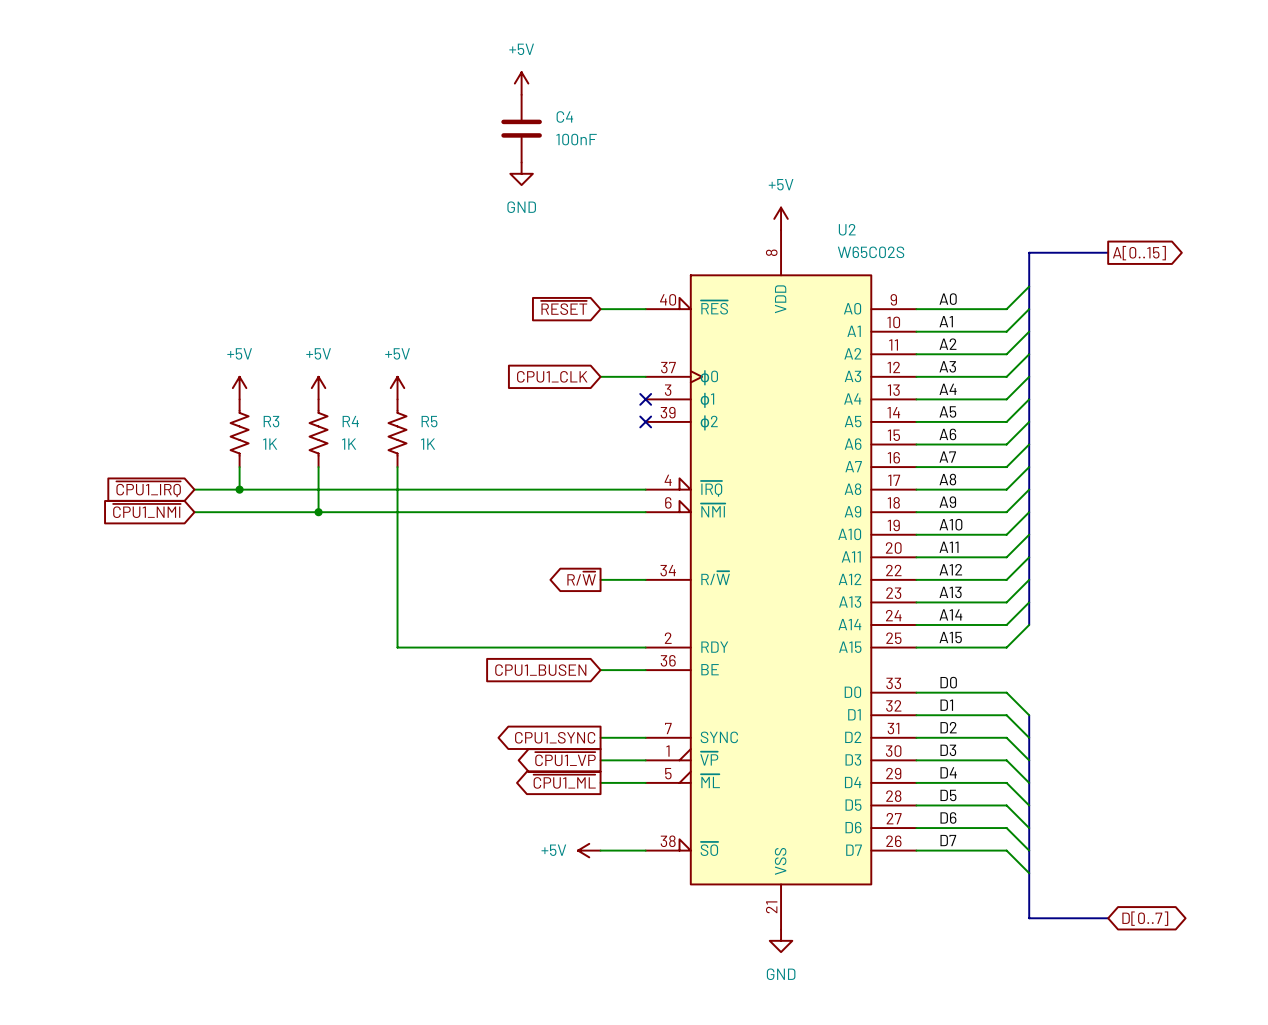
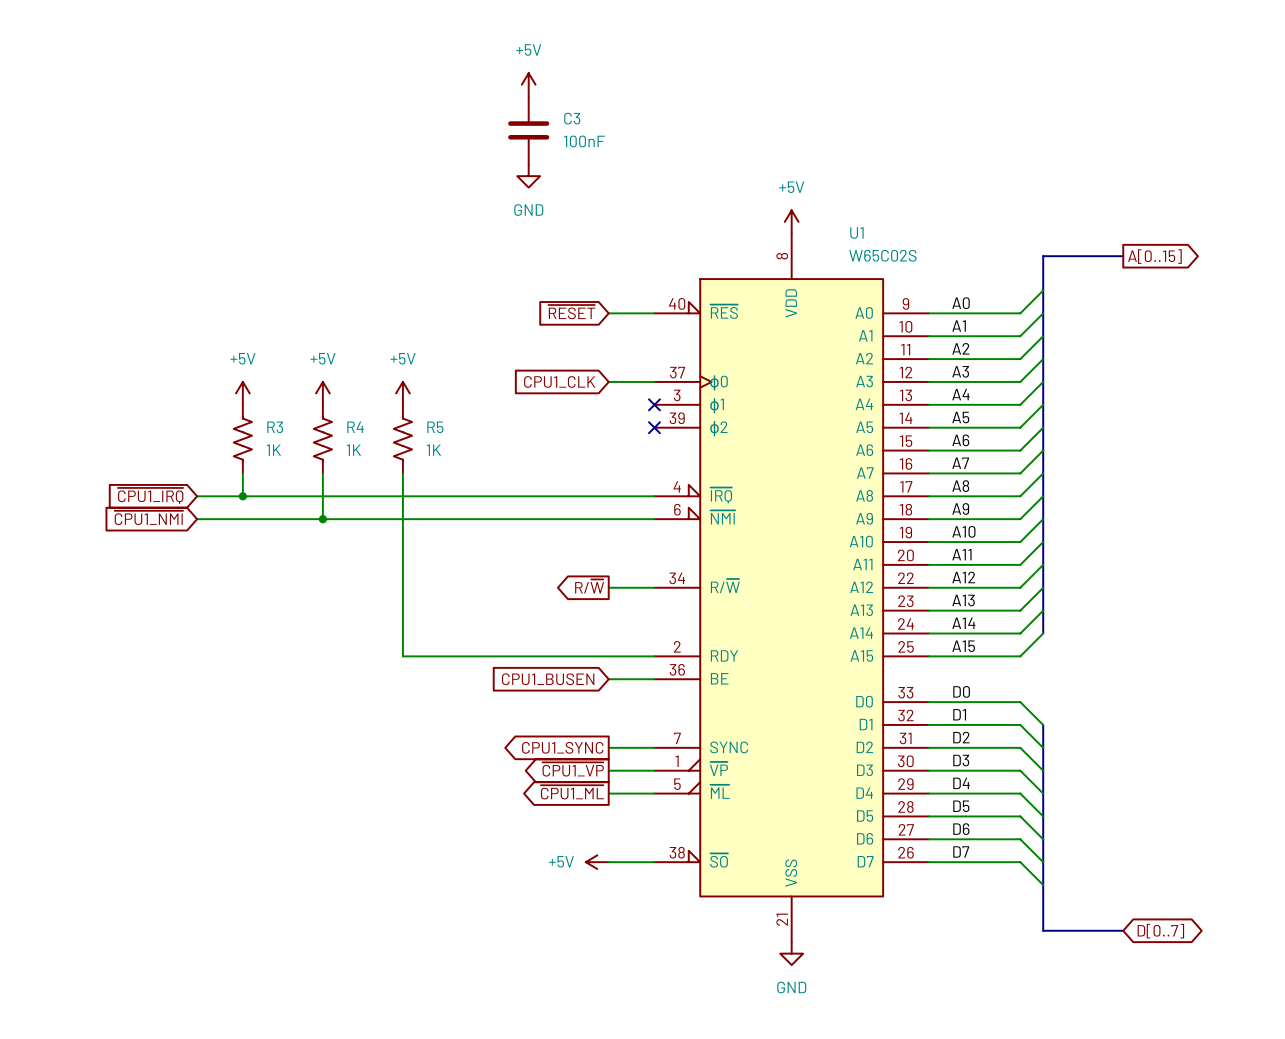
C4 name: C4 (564, 116) -> C3 (572, 118)
U2 name: U2 (847, 229) -> U1 (856, 232)

